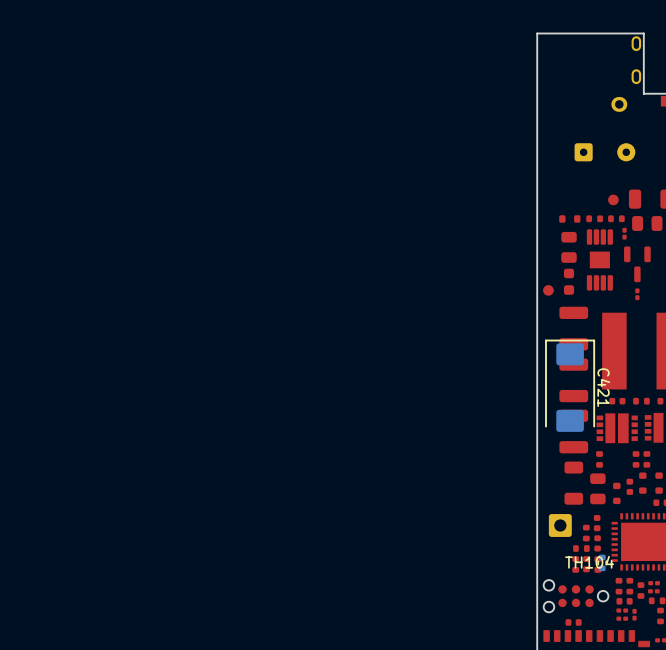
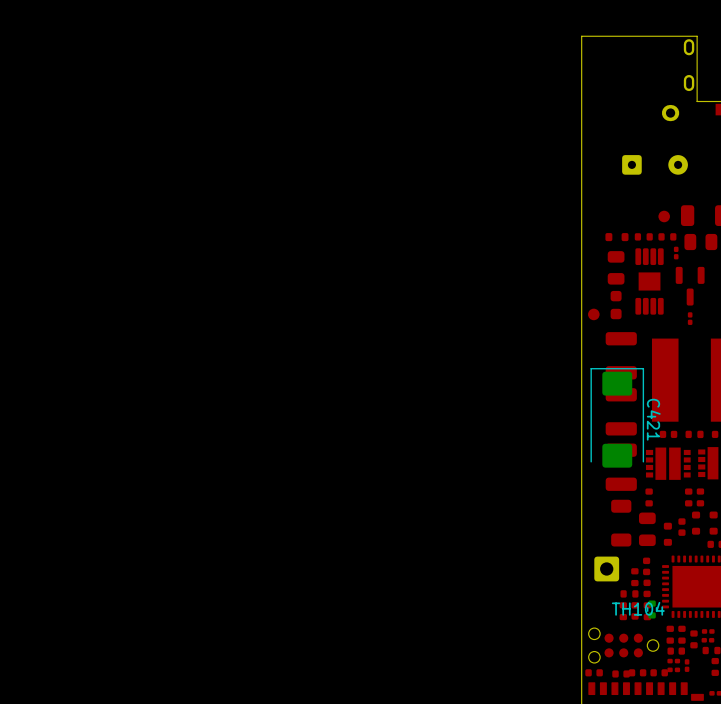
part: none -> (594, 672)
part: none -> (637, 672)
part: none -> (659, 672)

